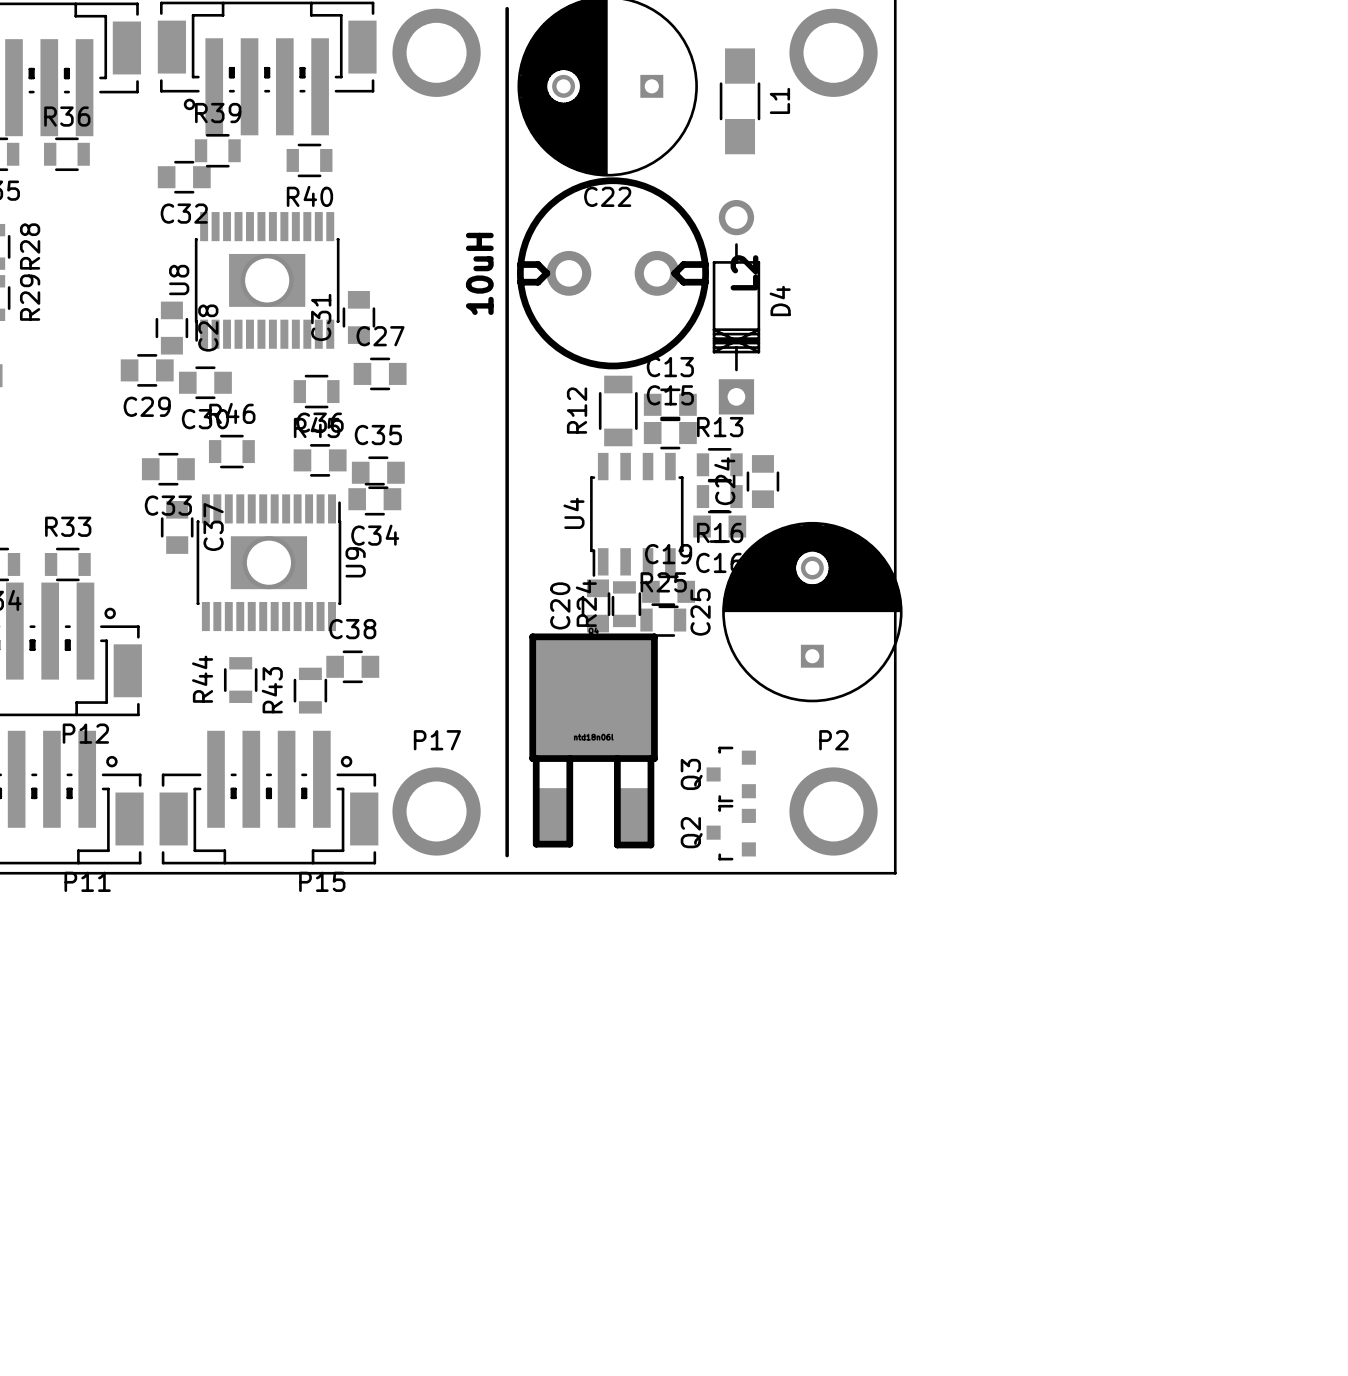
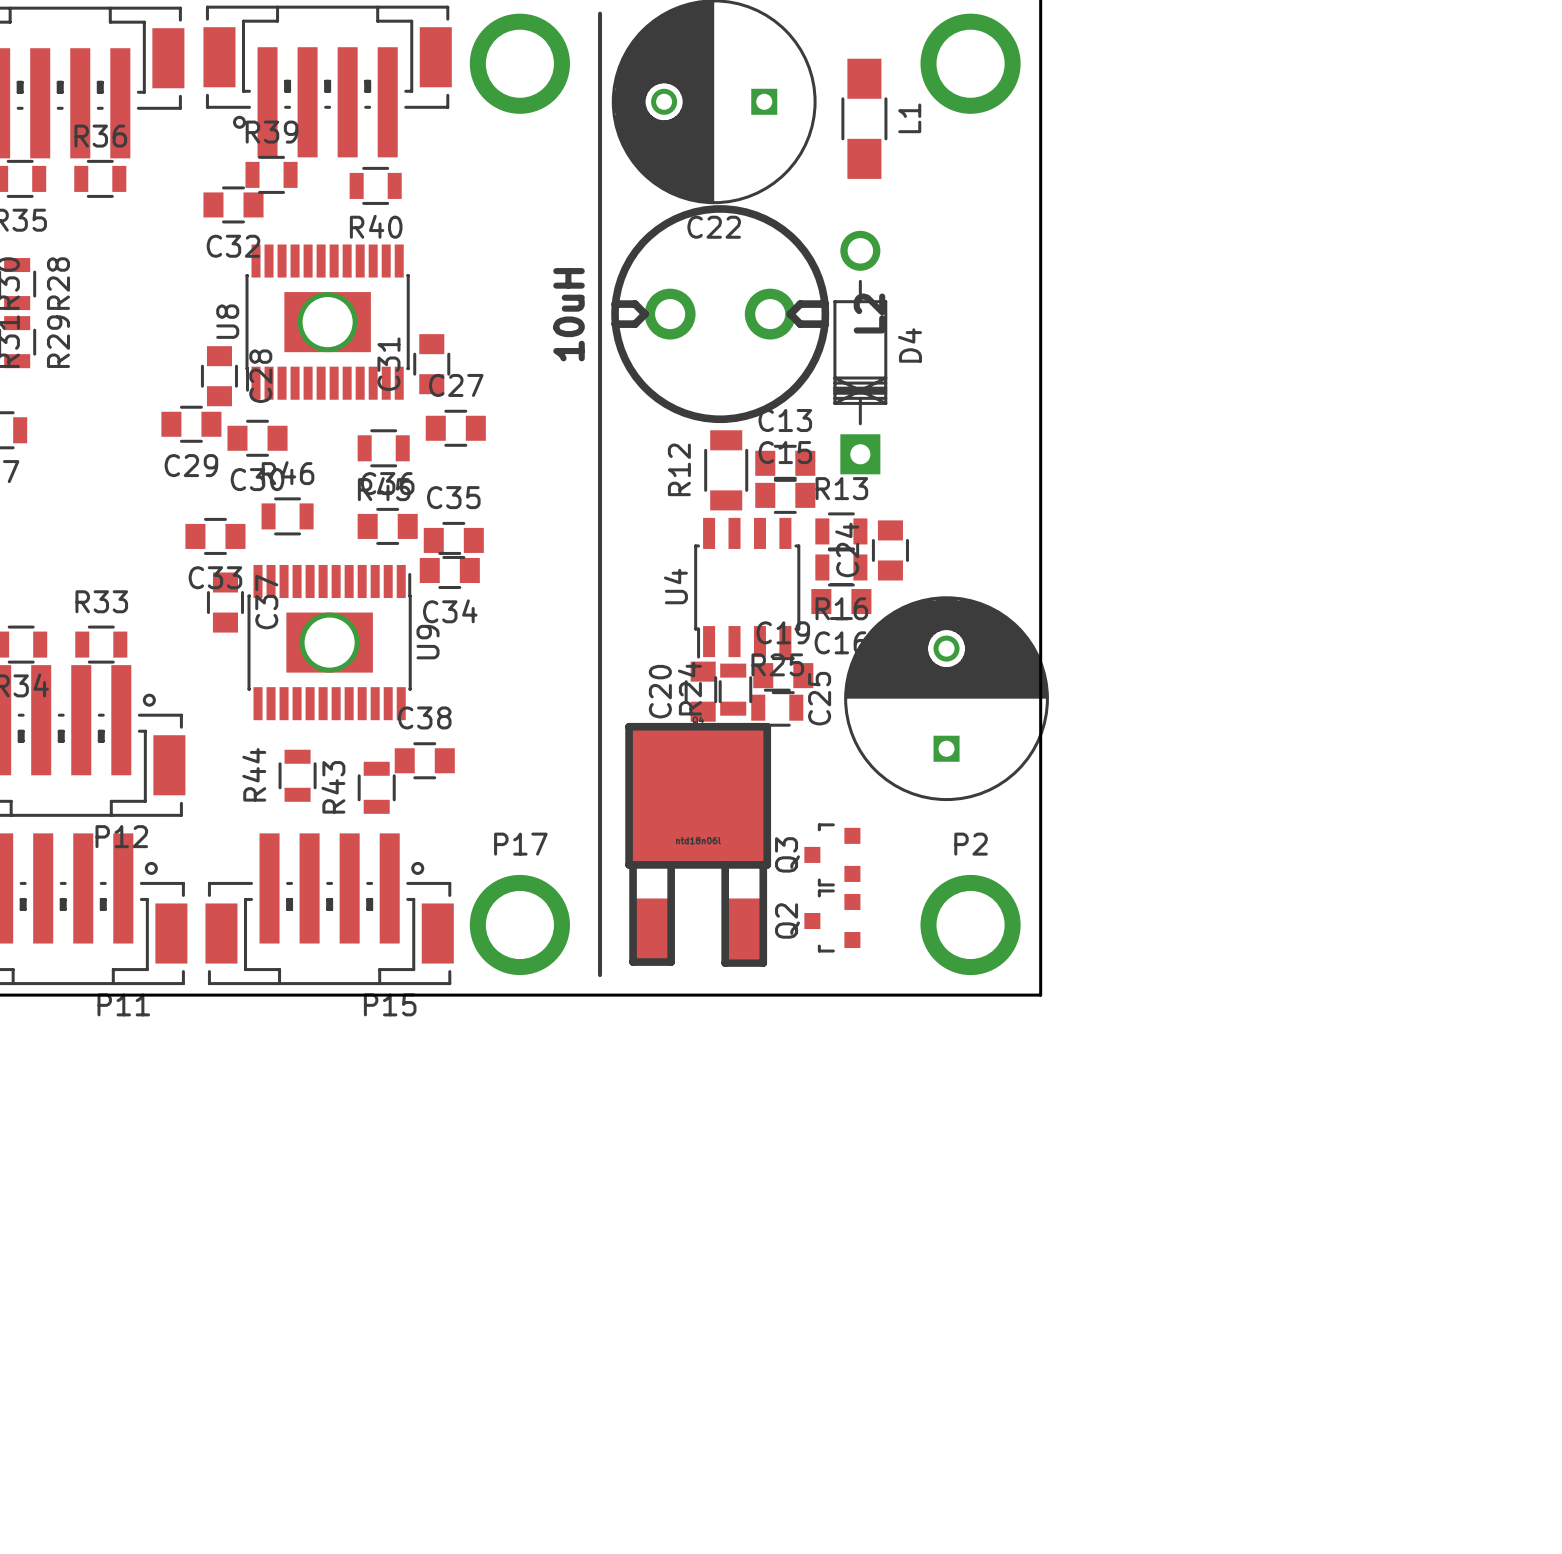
Q3 position: (731, 774) -> (832, 854)
Q2 position: (731, 832) -> (832, 920)

